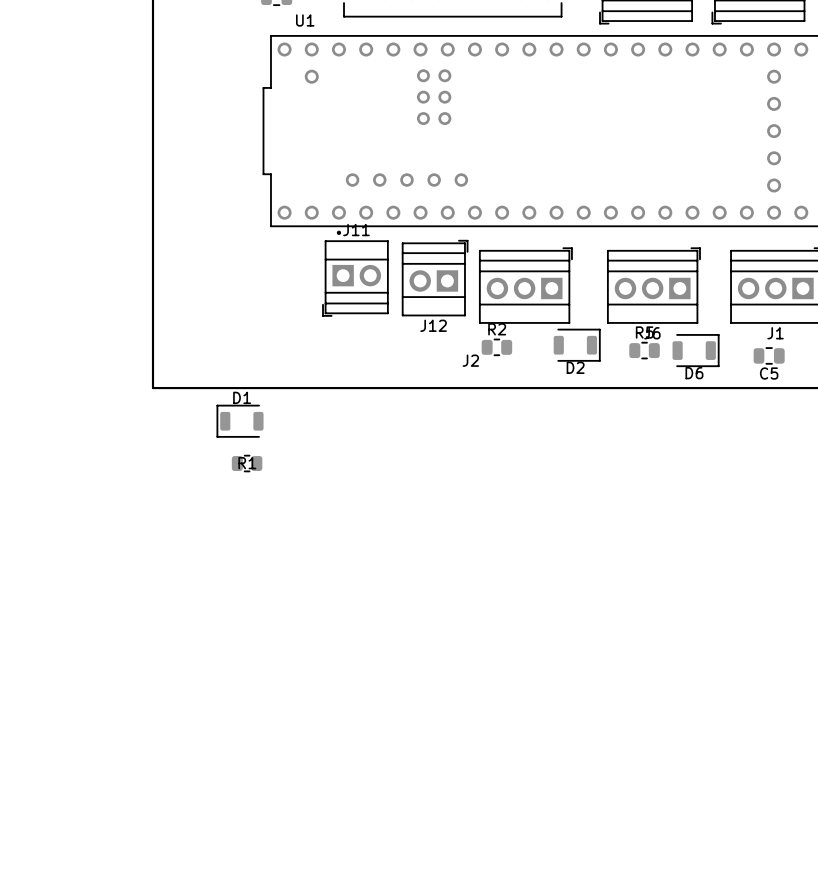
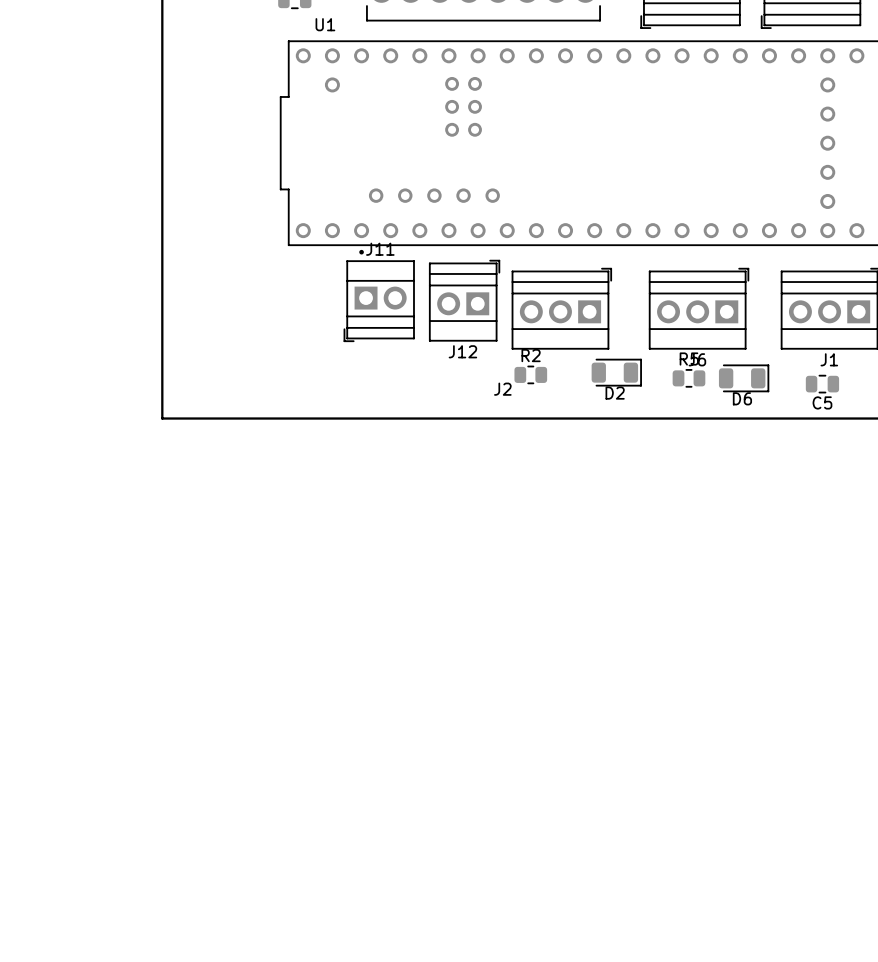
D2 footprint: [553, 328, 601, 362] -> [591, 358, 642, 387]
D6 footprint: [672, 334, 720, 367] -> [718, 364, 770, 393]
D1: (240, 421) -> none
R1: (247, 463) -> none

